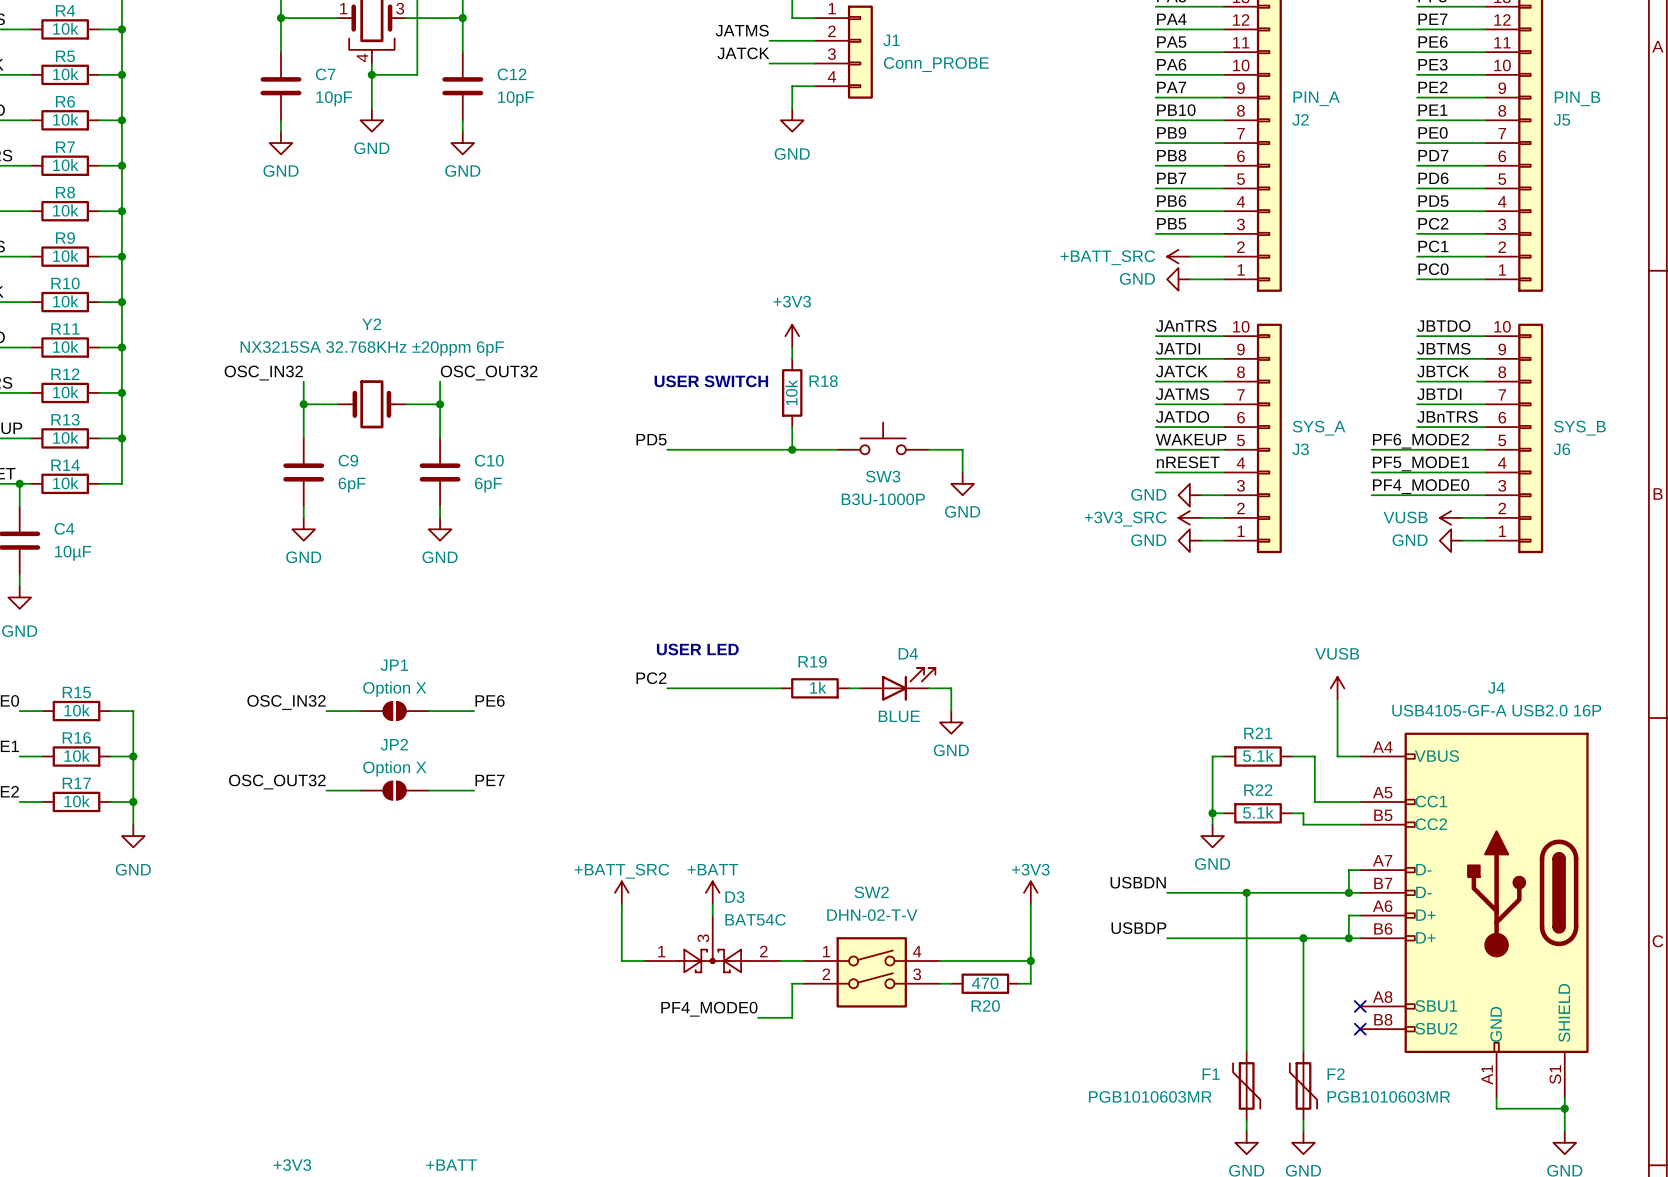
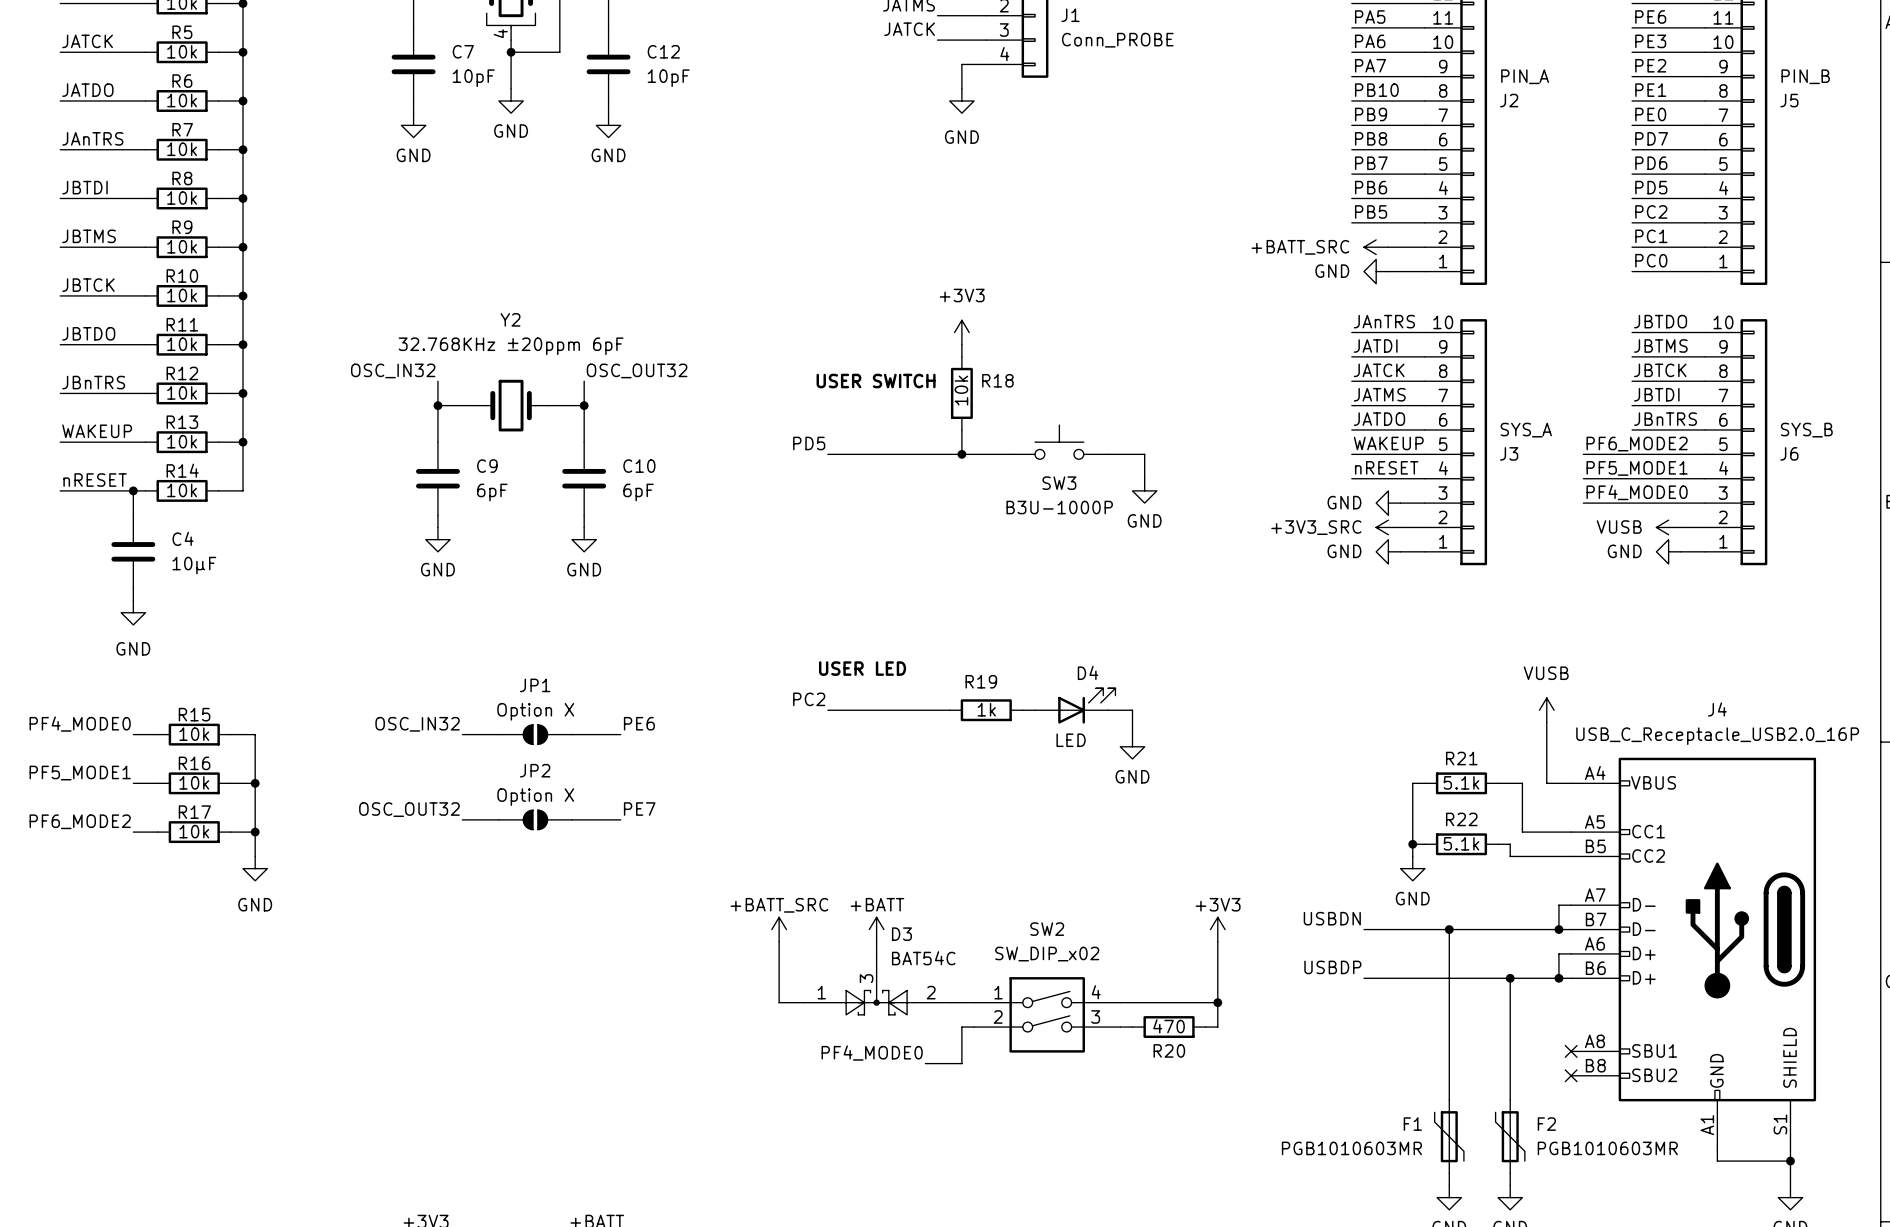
Y2 value: NX3215SA 32.768KHz ±20ppm 6pF (372, 348) -> 32.768KHz ±20ppm 6pF (511, 346)
J4 value: USB4105-GF-A USB2.0 16P (1496, 710) -> USB_C_Receptacle_USB2.0_16P (1717, 736)
D4 value: BLUE (899, 716) -> LED (1071, 740)
SW2 value: DHN-02-T-V (872, 915) -> SW_DIP_x02 (1047, 954)

